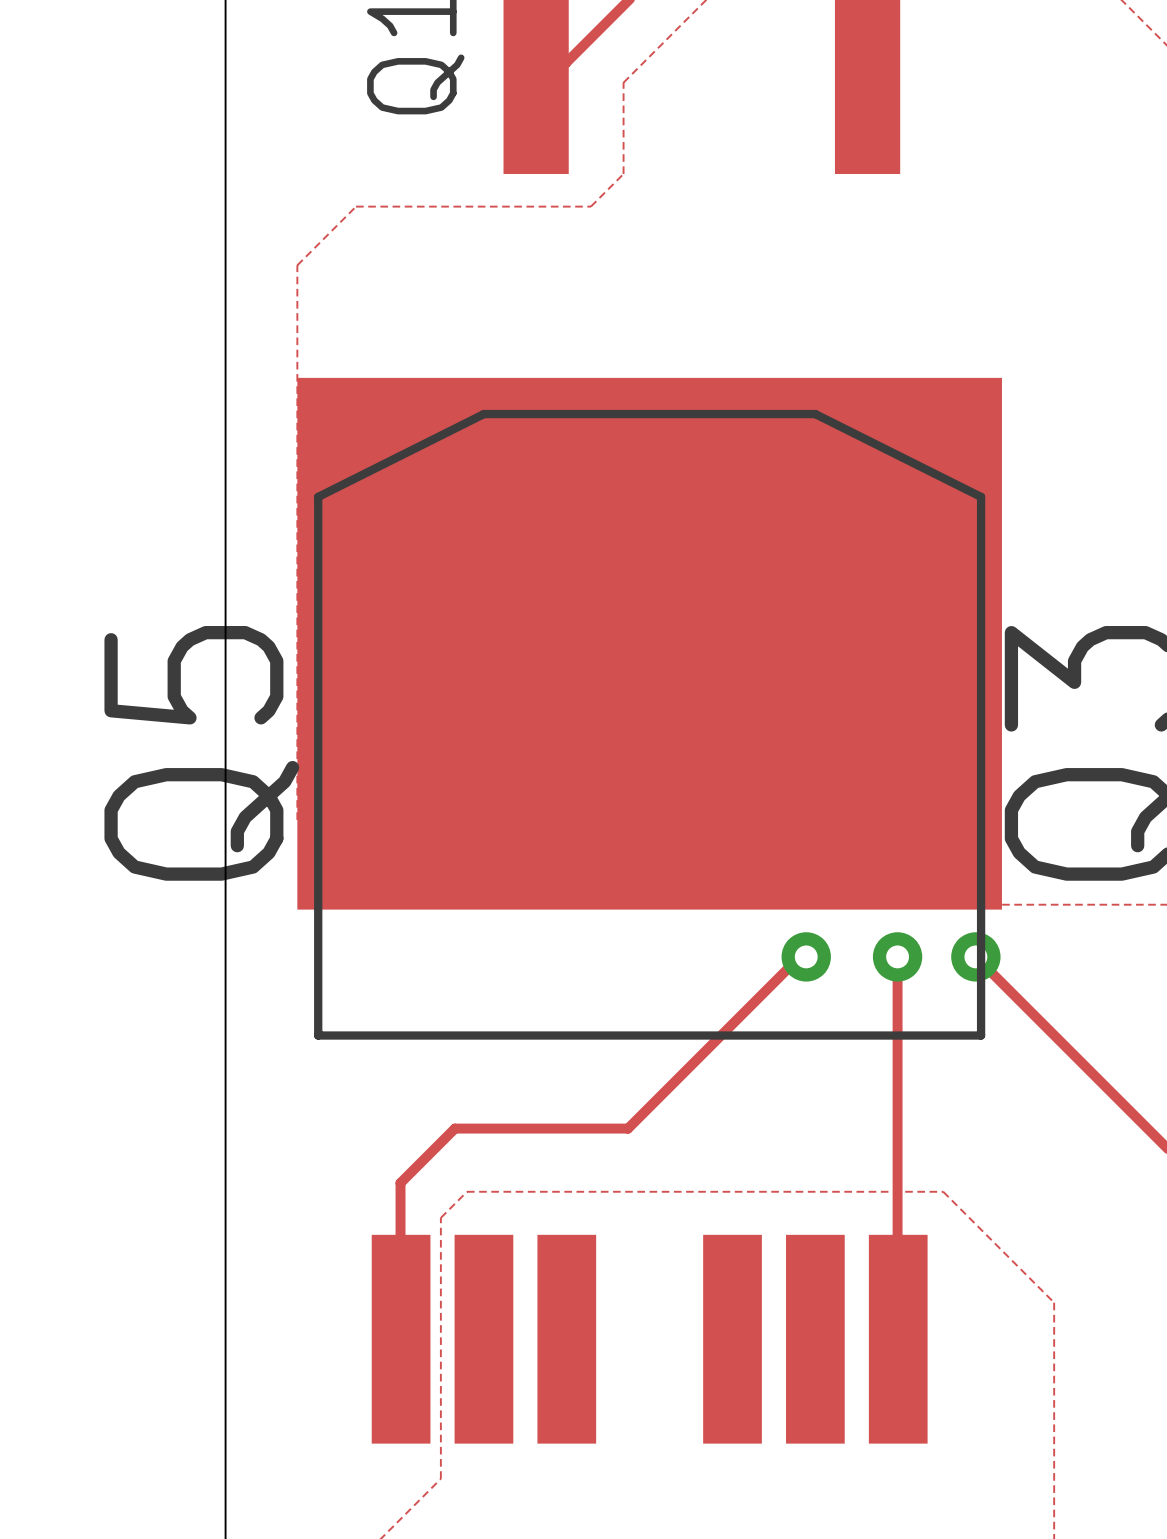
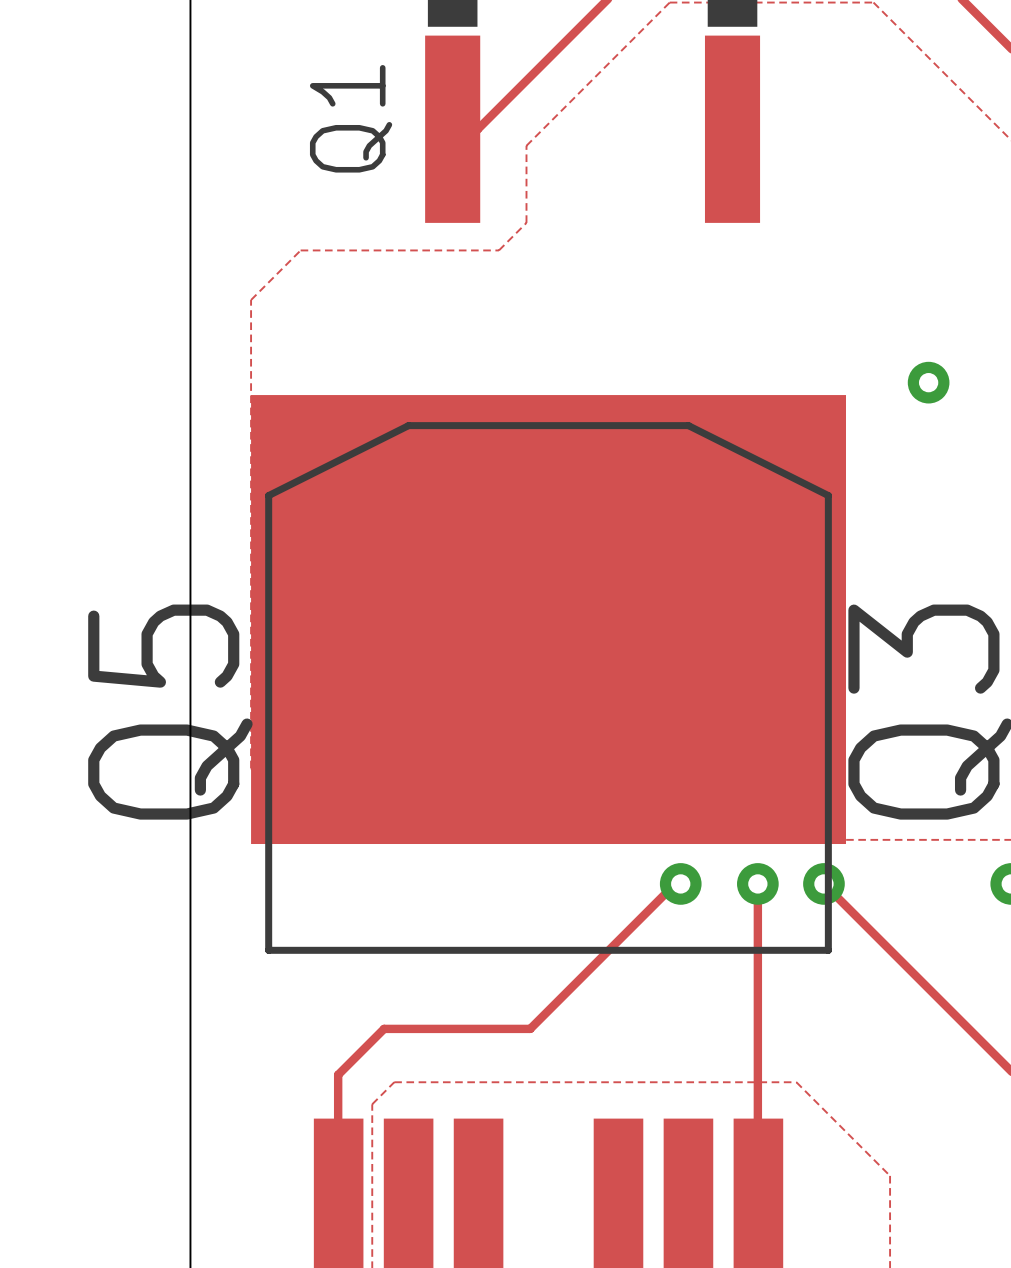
via: none -> (928, 382)

